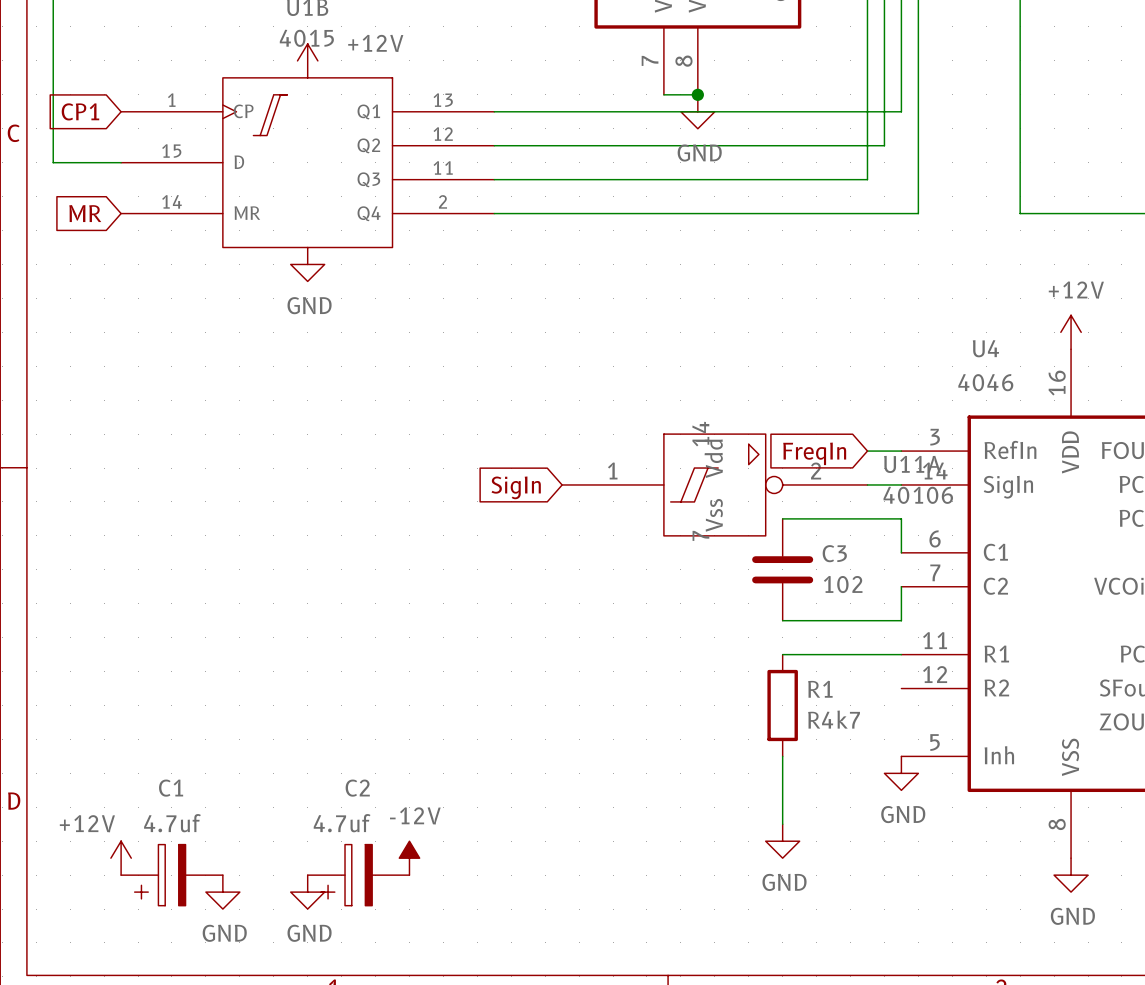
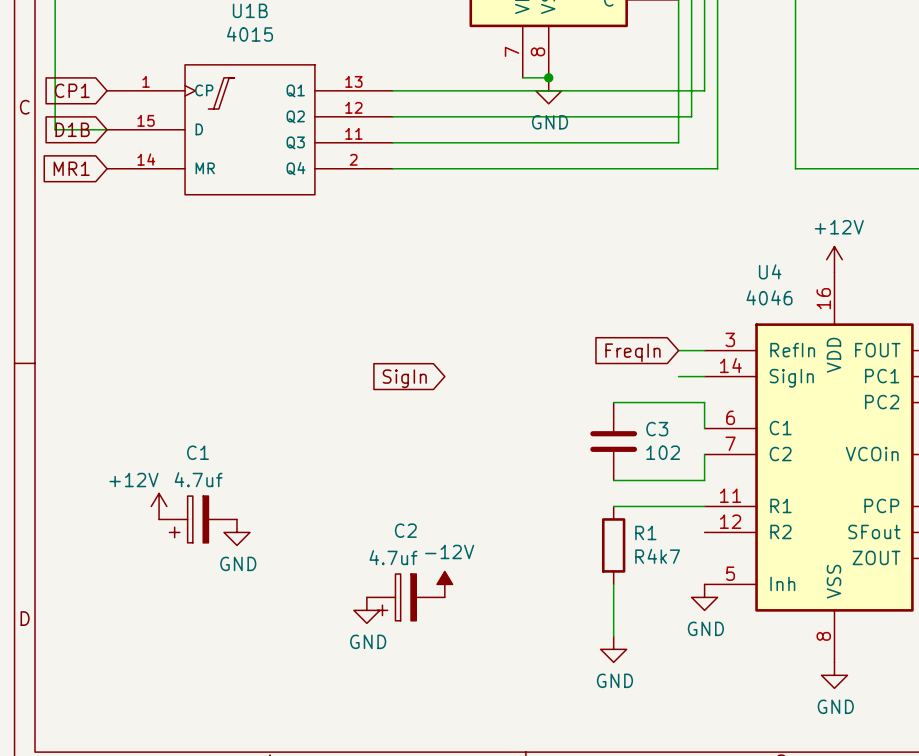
power symbol: +12V (307, 60) -> none
global label: none -> D1B (72, 129)
global label: MR (85, 213) -> MR1 (71, 168)
power symbol: GND (307, 264) -> none
U11A: 40106 (714, 484) -> none
power symbol: none -> GND (236, 532)
power symbol: none -> GND (366, 610)
power symbol position: +12V (121, 858) -> +12V (159, 506)
power symbol position: -12V (409, 858) -> -12V (444, 584)
C1 position: (171, 875) -> (198, 519)
C2 position: (358, 875) -> (405, 597)
power symbol: GND (222, 892) -> none
power symbol: GND (307, 892) -> none

